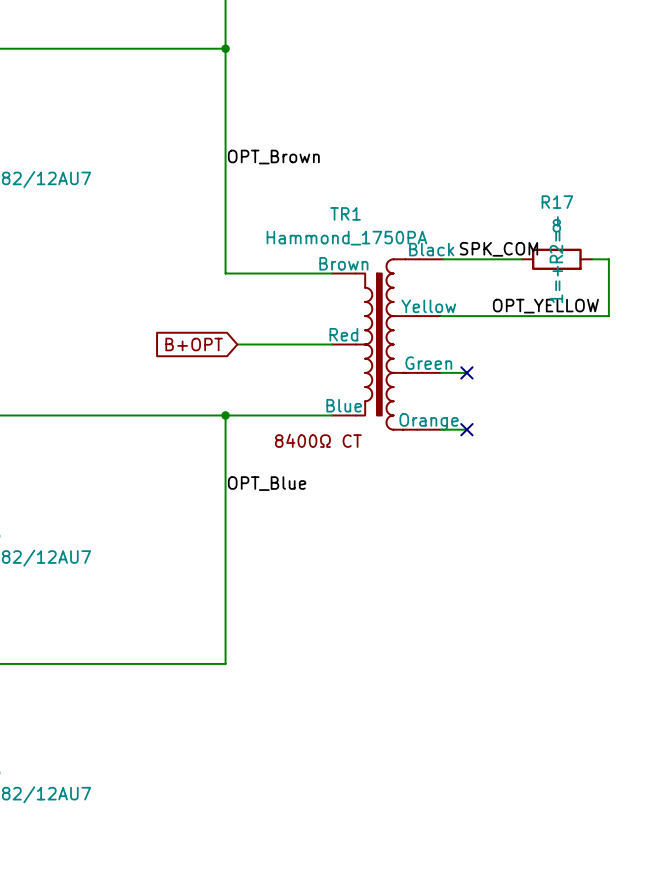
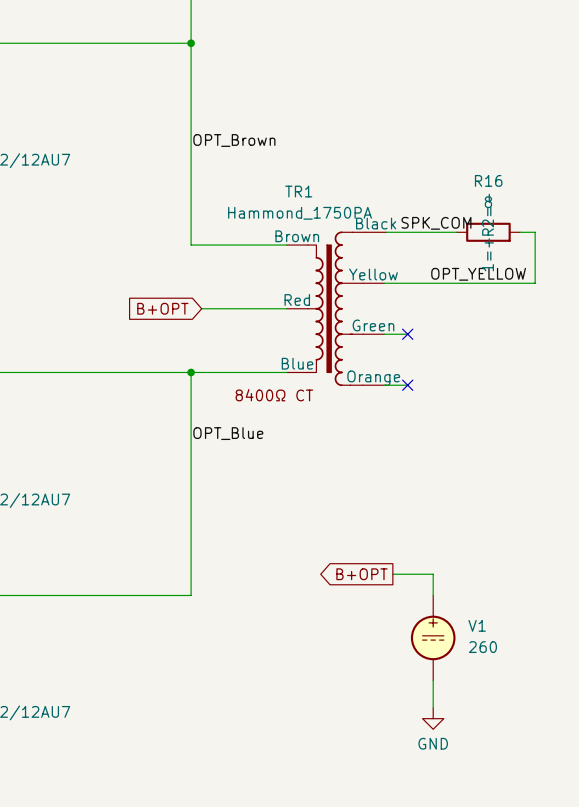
R17 name: R17 (557, 202) -> R16 (488, 180)
global label: none -> B+OPT (361, 574)
wire: none -> (392, 574) (433, 574) (433, 595)
V1: none -> 260 (433, 637)
wire: none -> (433, 680) (433, 708)
power symbol: none -> GND (433, 718)

